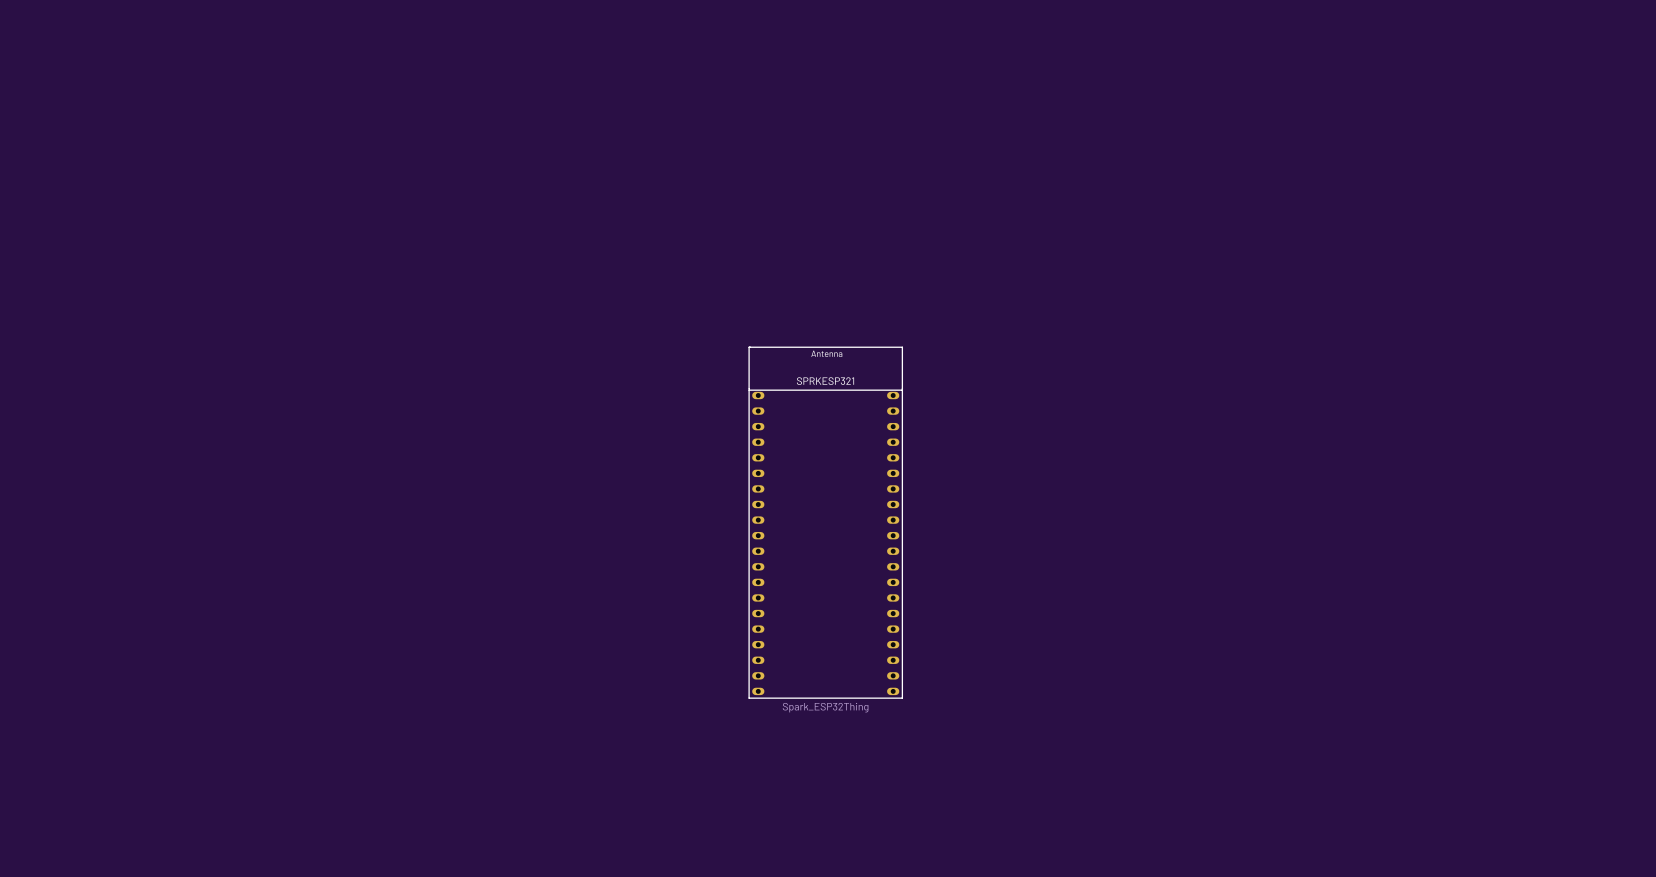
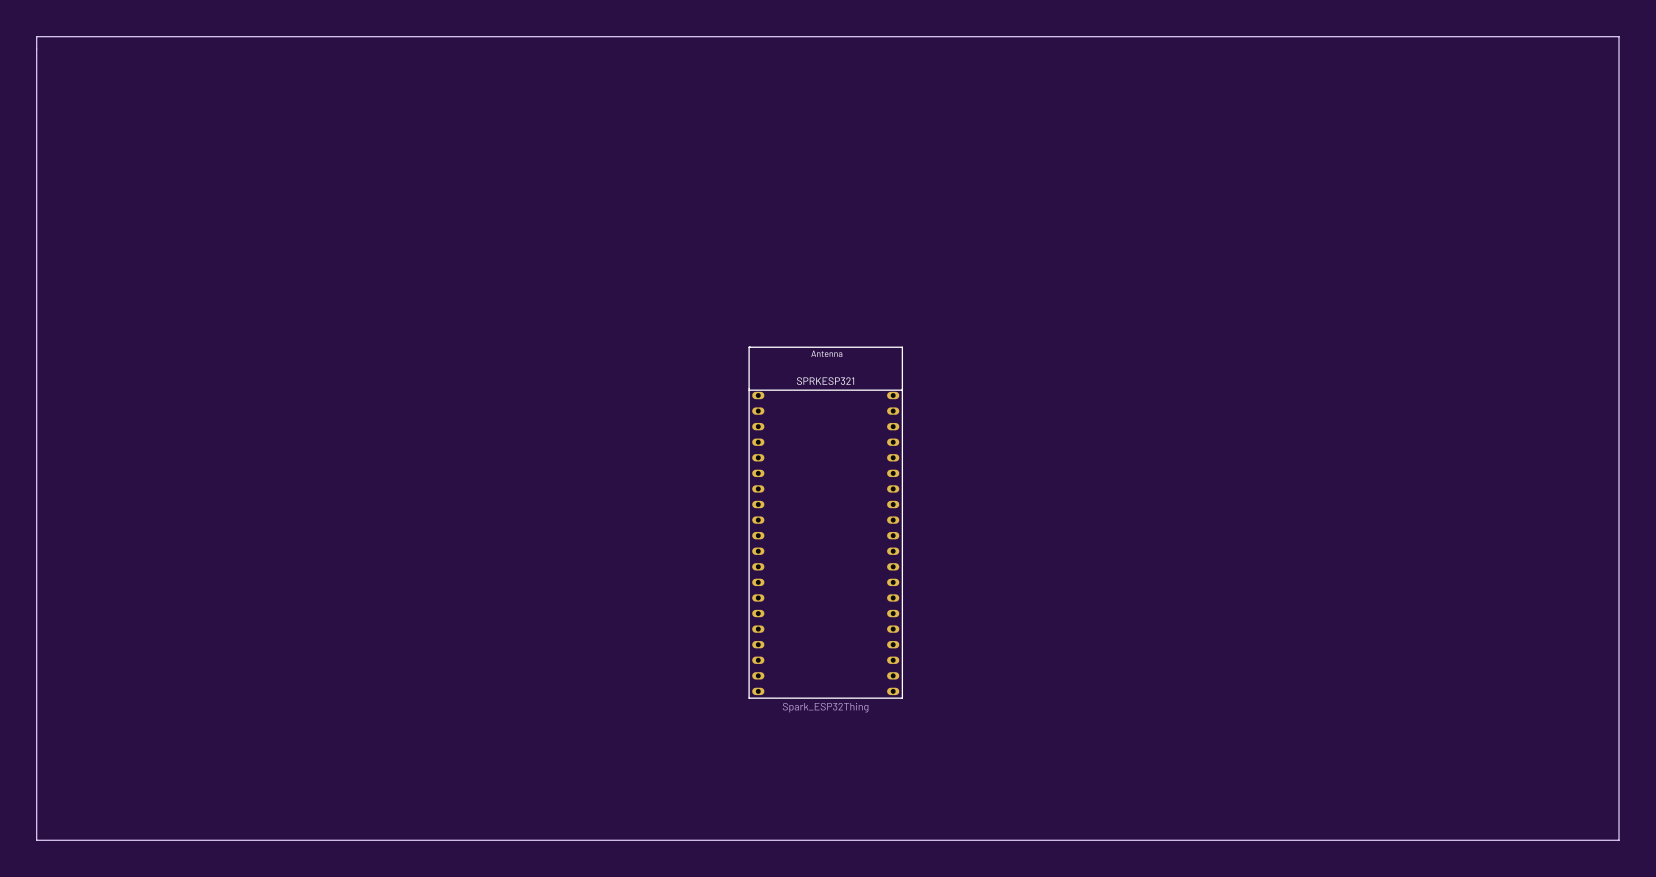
board edge: none -> (36, 36) (36, 840) (1619, 840) (1619, 36) (36, 36)

